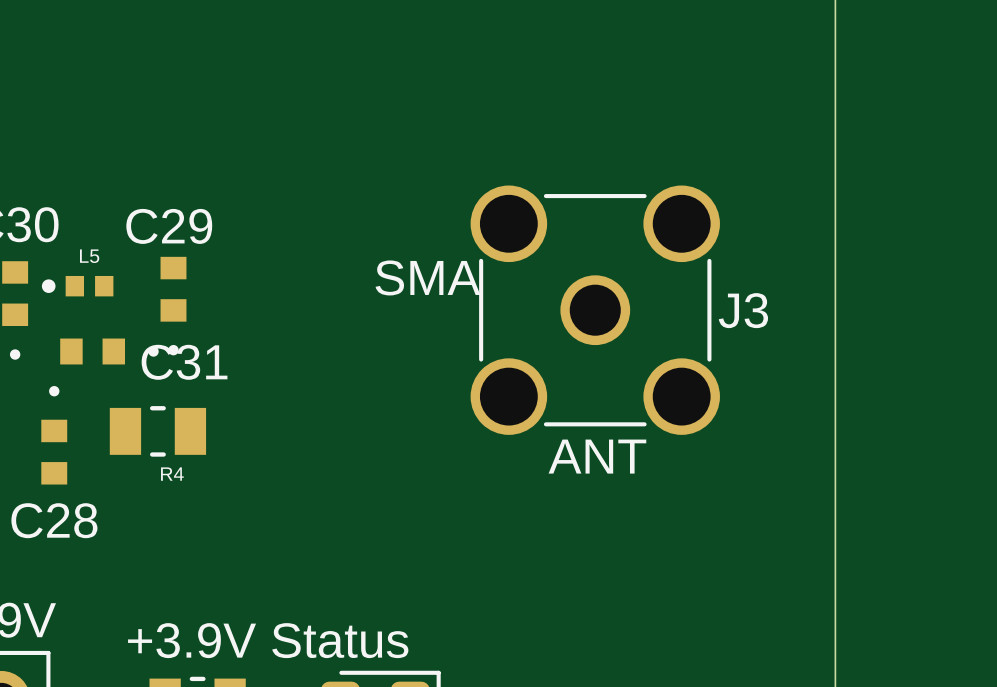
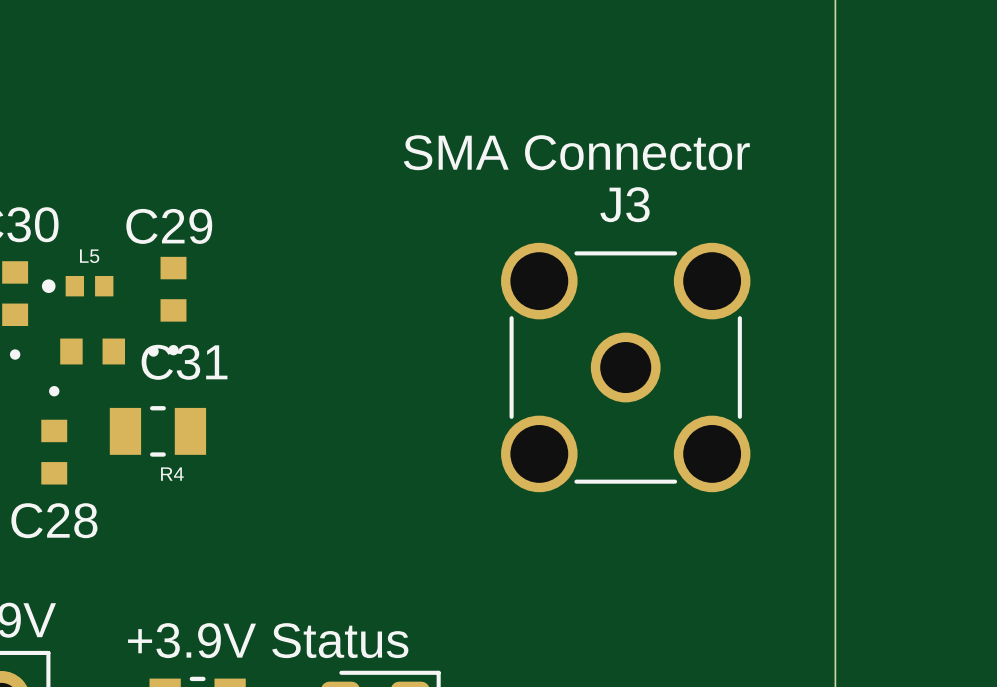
text: none -> SMA Connector (576, 152)
text: SMA (427, 277) -> none
J3 position: (595, 310) -> (625, 367)
J3 name position: J3 (743, 310) -> J3 (625, 204)
text: ANT (597, 456) -> none

